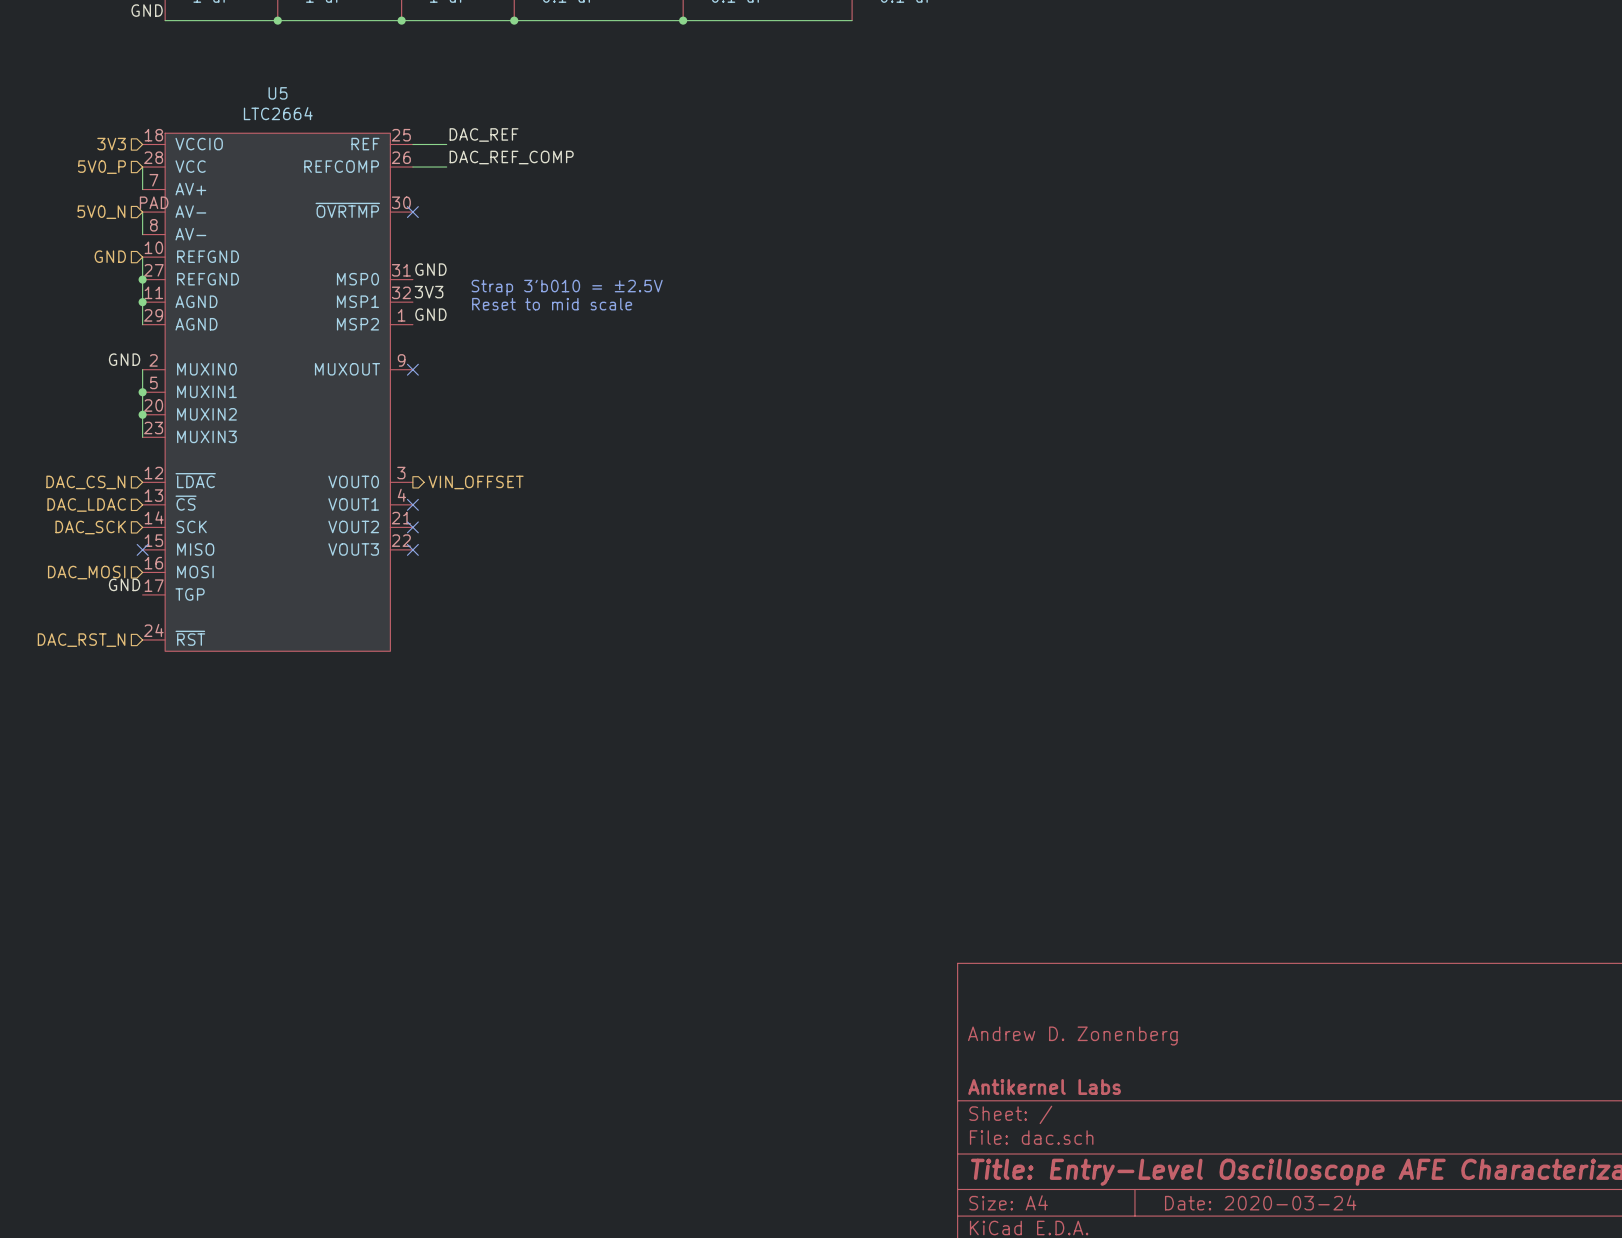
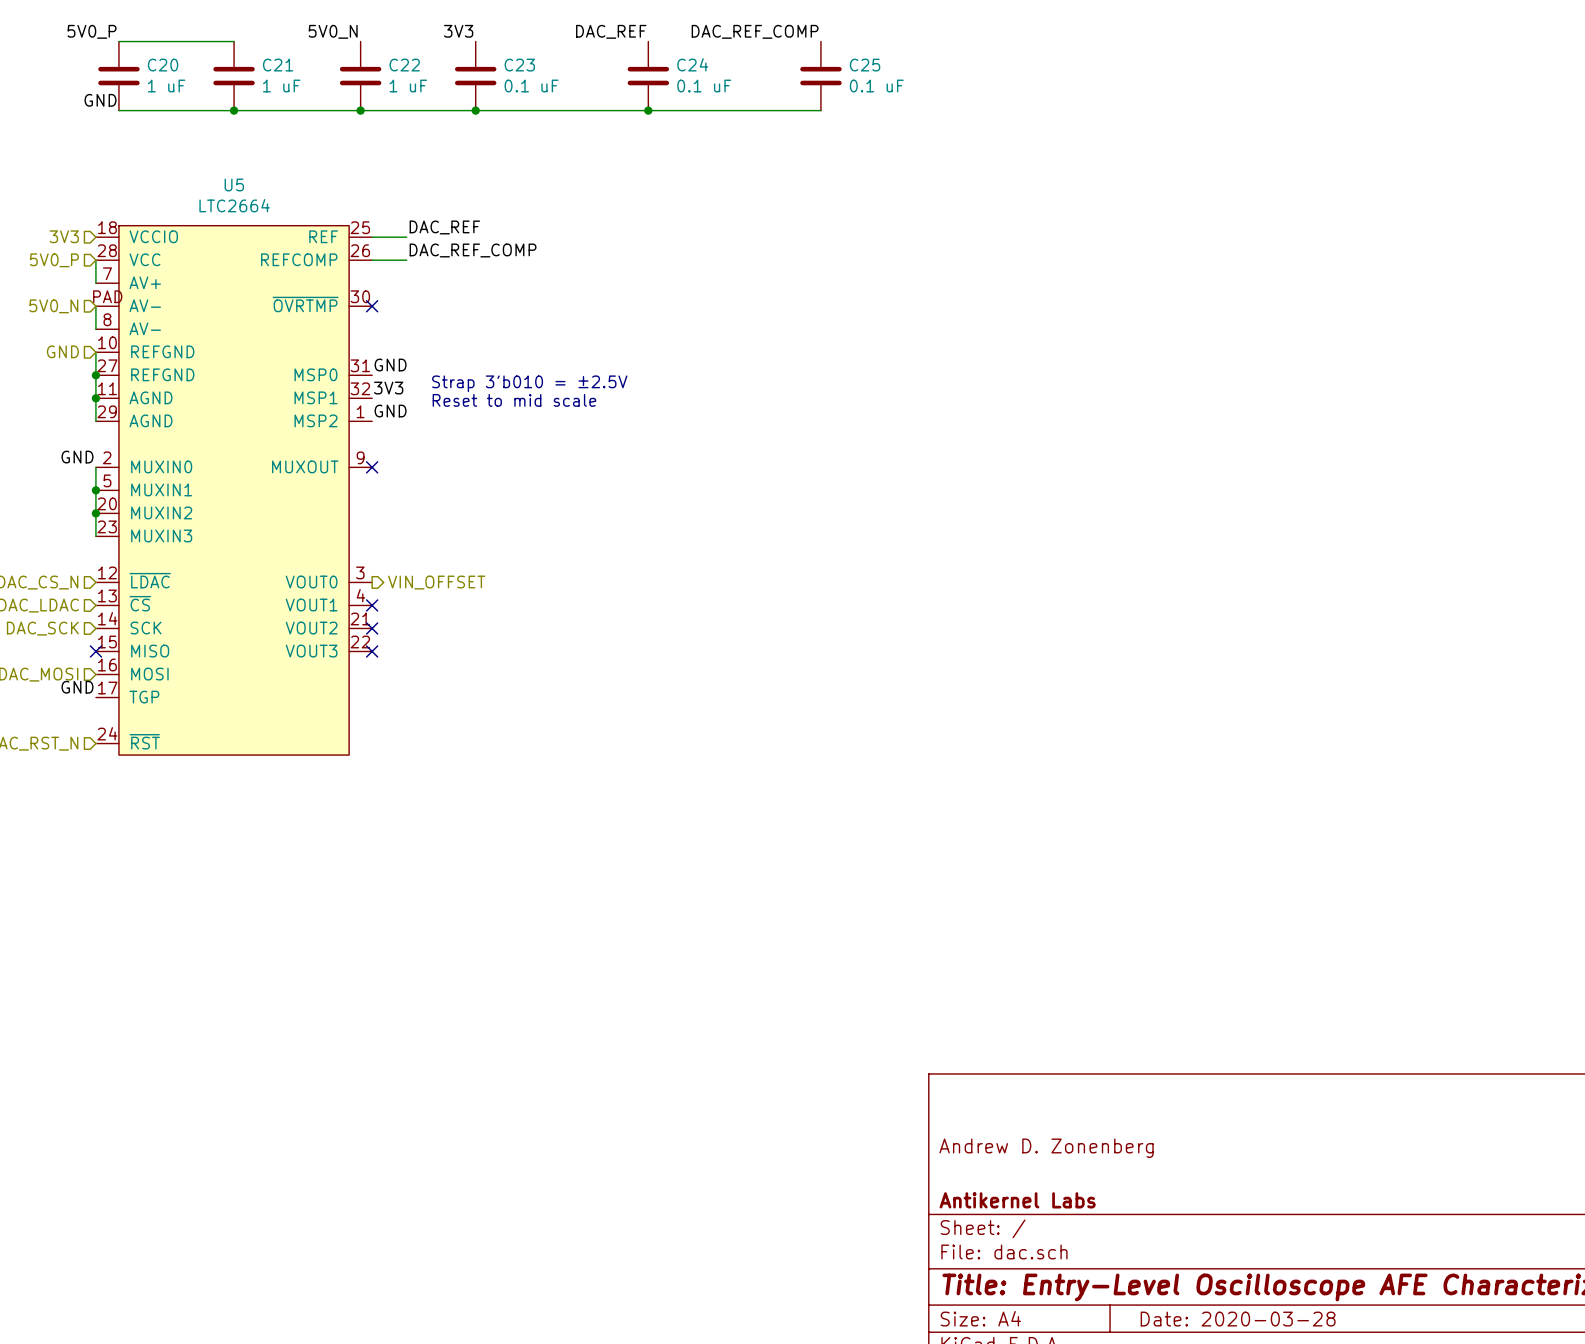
title block: Date: 2020-03-24 (1260, 1202) -> Date: 2020-03-28 (1238, 1319)

